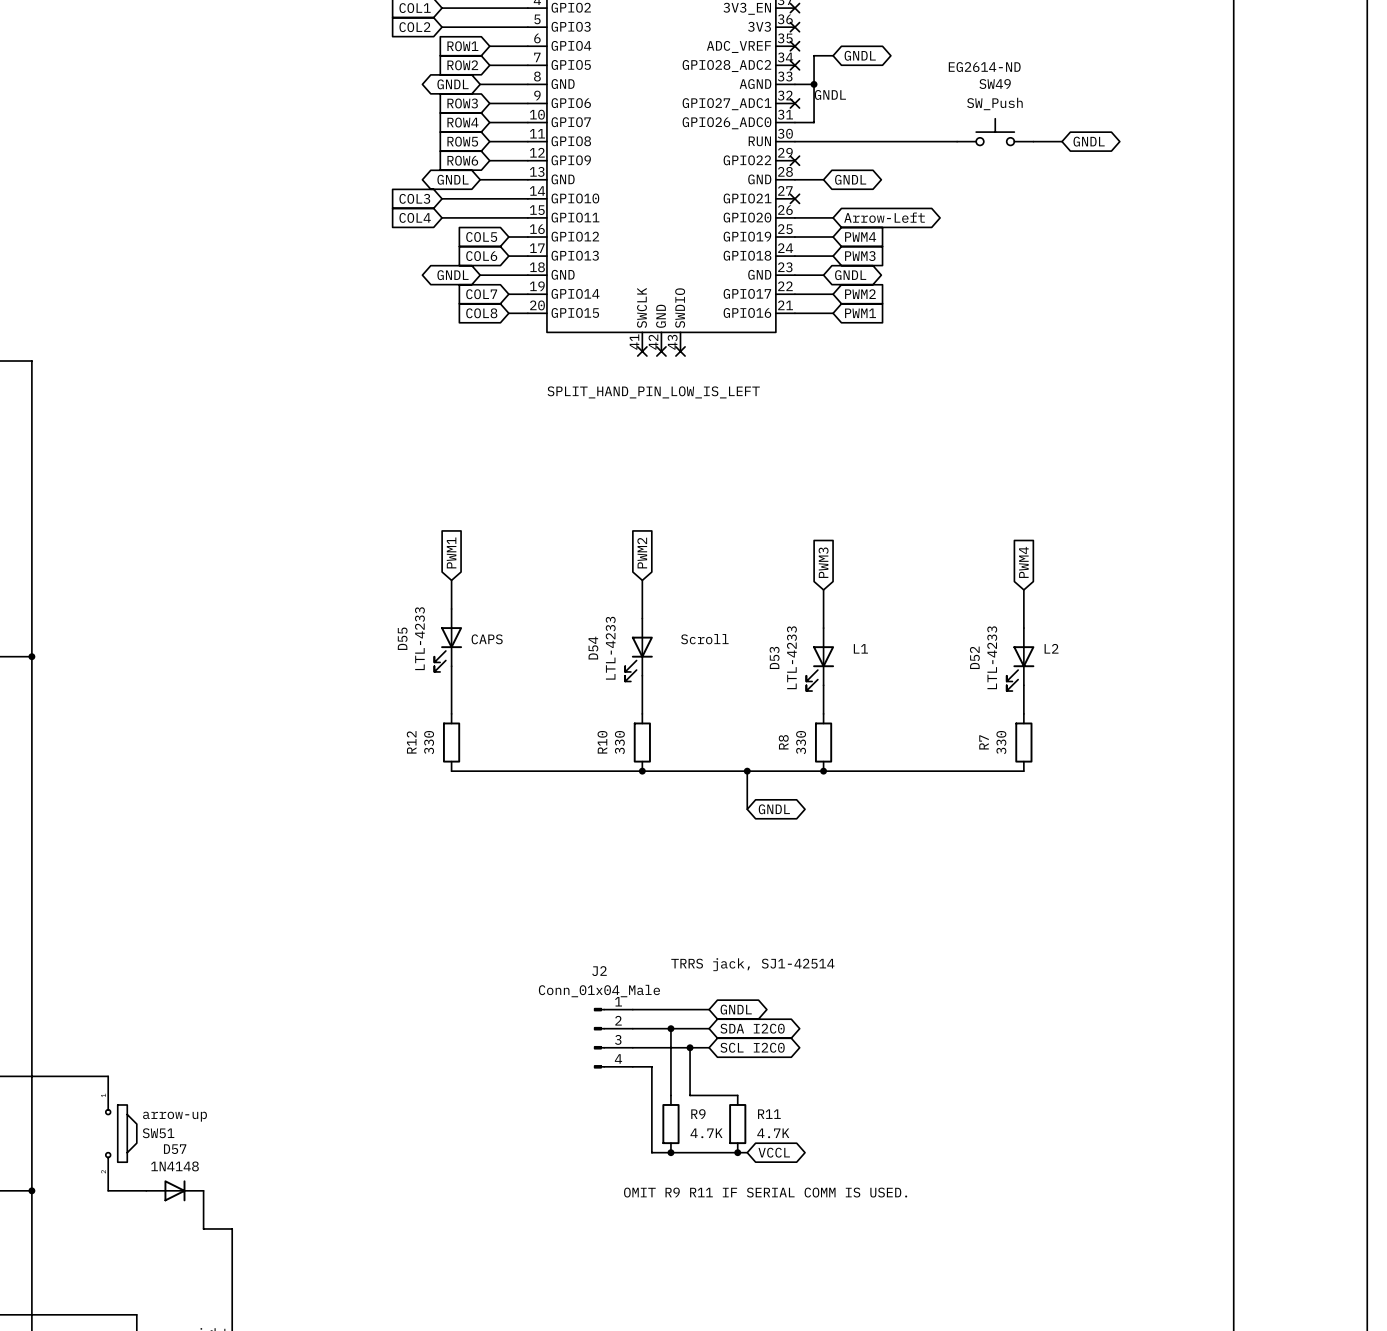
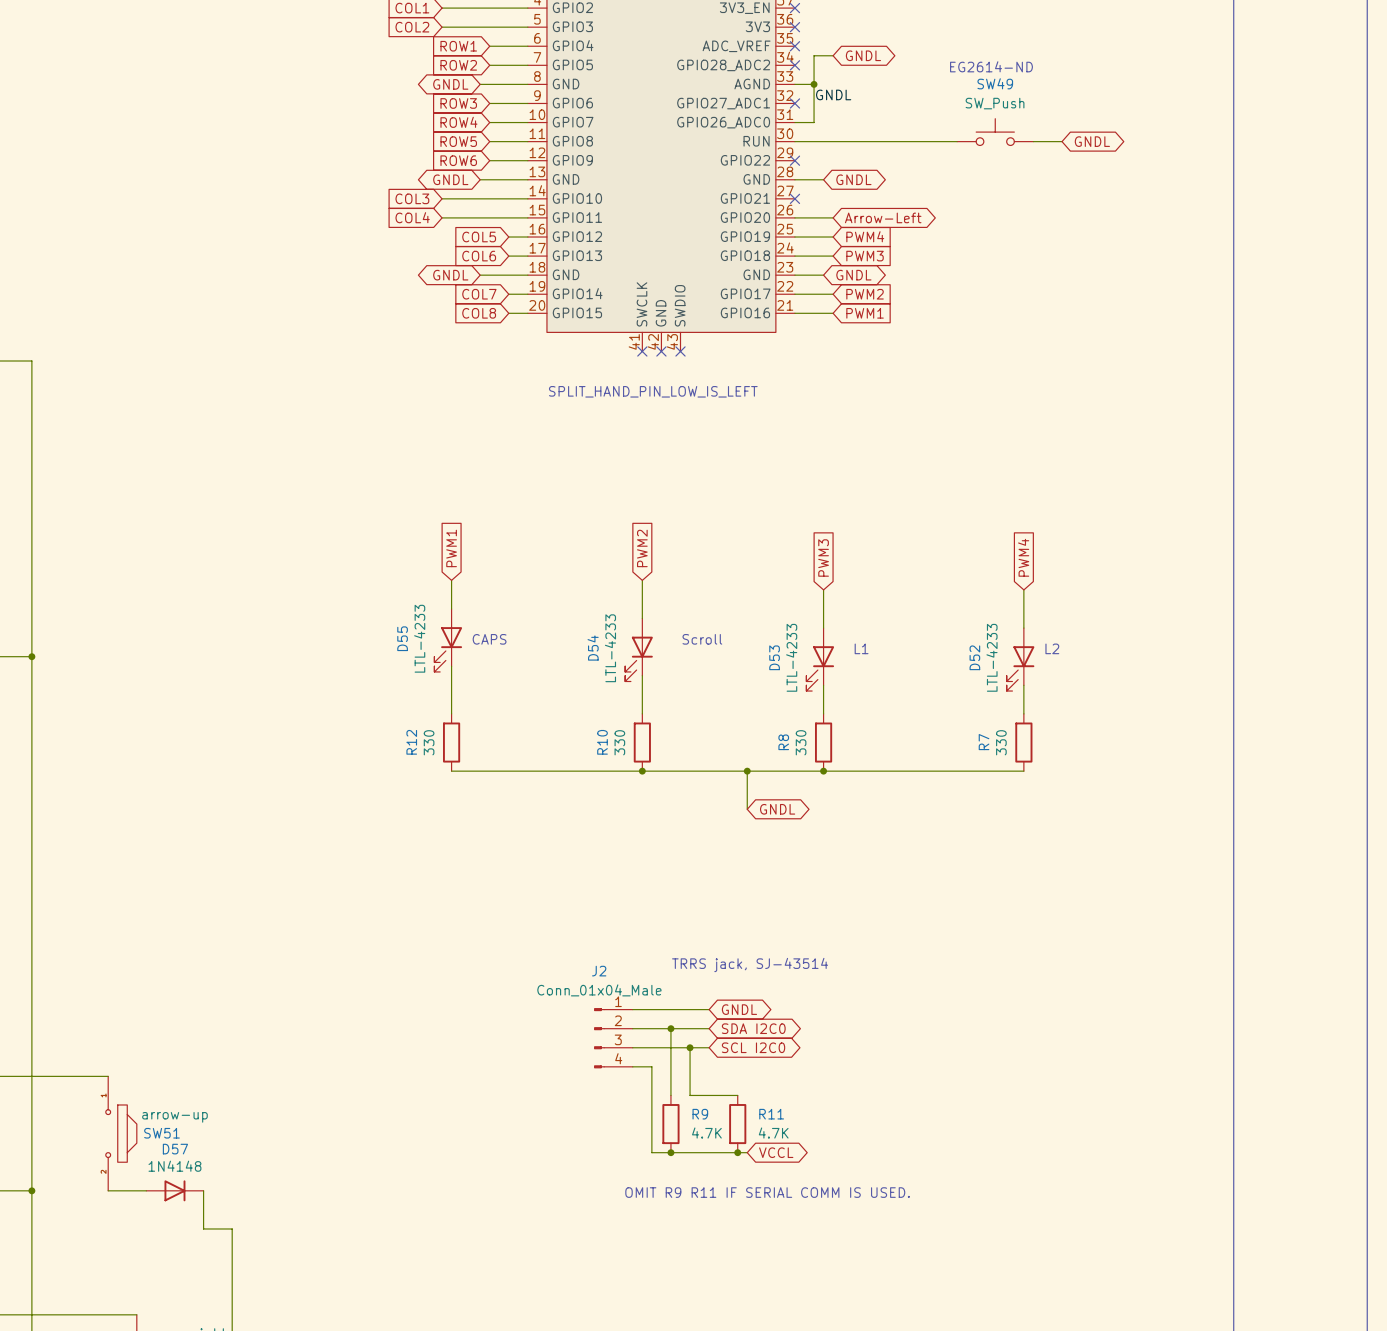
text: TRRS jack, SJ1-42514 (752, 964) -> TRRS jack, SJ-43514 (750, 965)

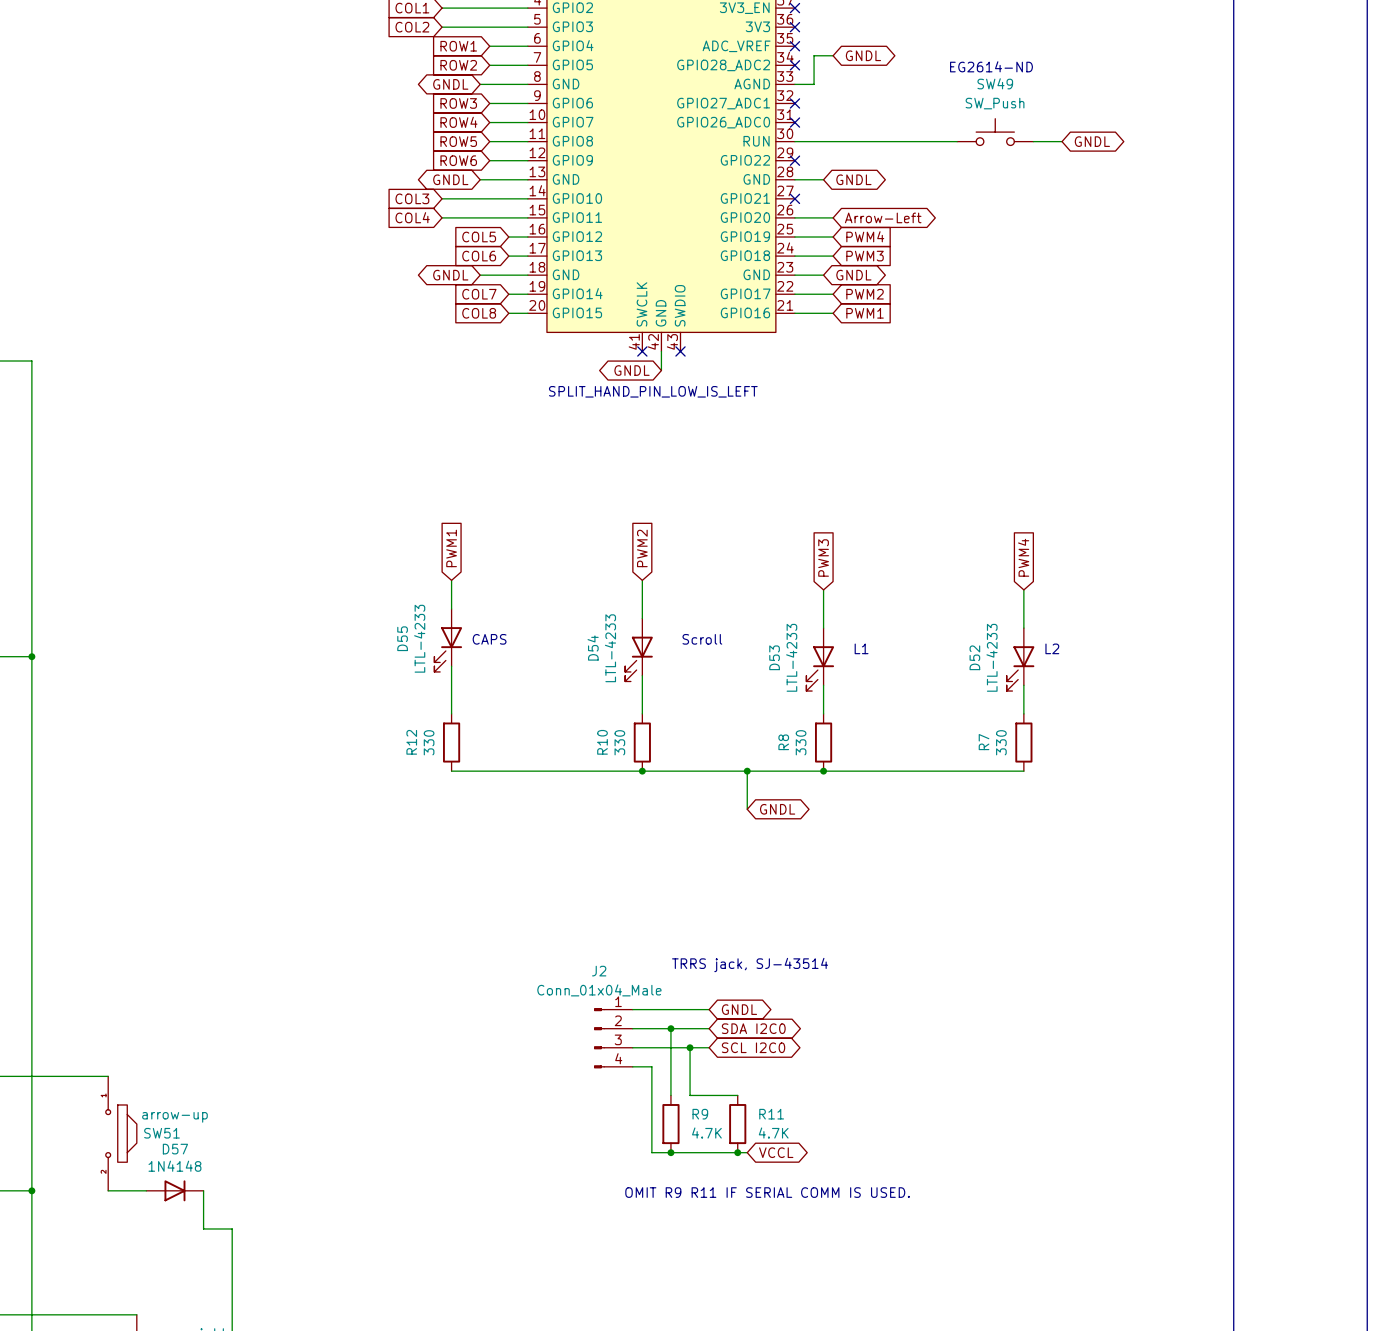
wire: (814, 84) (814, 122) (794, 122) -> none
junction: (814, 84) -> none
label: GNDL (833, 94) -> none
no-connect mark: none -> (794, 122)
wire: none -> (661, 351) (661, 370)
no-connect mark: (661, 351) -> none
global label: none -> GNDL (631, 370)

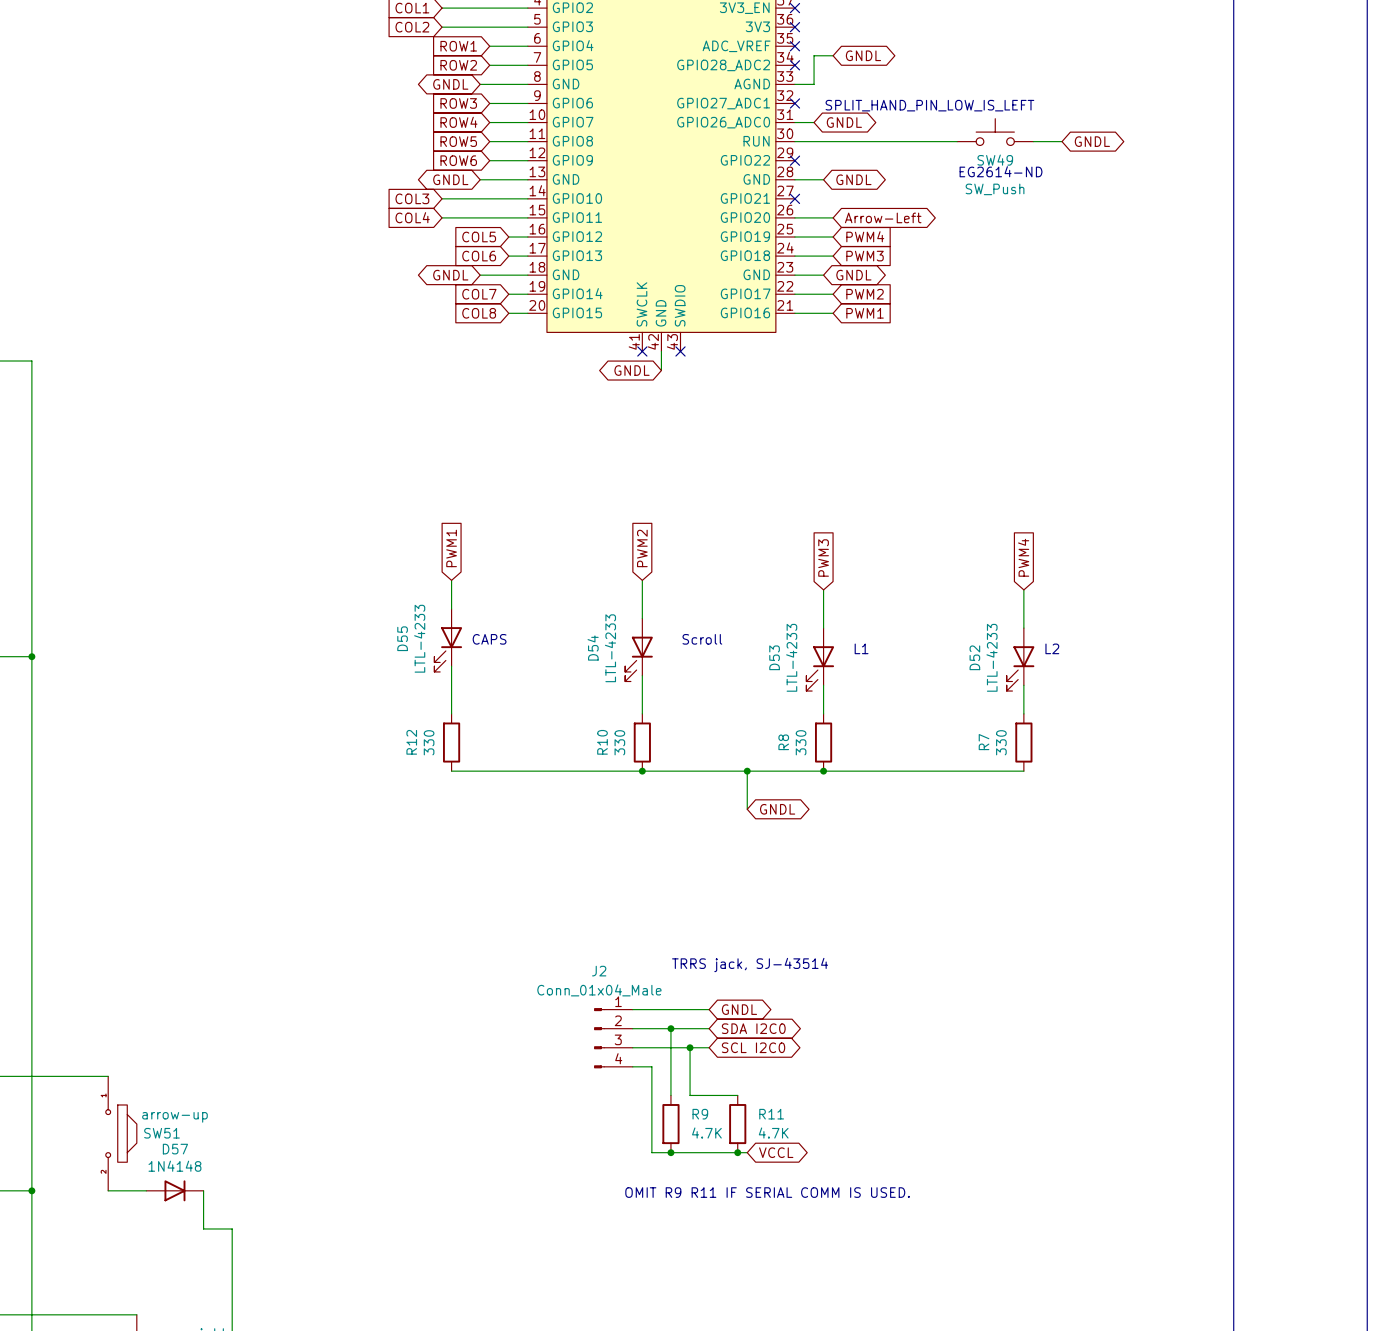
text position: EG2614-ND (991, 66) -> EG2614-ND (1001, 171)
SW49 name position: SW49 (995, 83) -> SW49 (995, 160)
SW49 value position: SW_Push (995, 103) -> SW_Push (995, 189)
text: none -> SPLIT_HAND_PIN_LOW_IS_LEFT (929, 105)
wire: none -> (794, 122) (814, 122)
no-connect mark: (794, 122) -> none
global label: none -> GNDL (844, 122)
text: SPLIT_HAND_PIN_LOW_IS_LEFT (653, 391) -> none

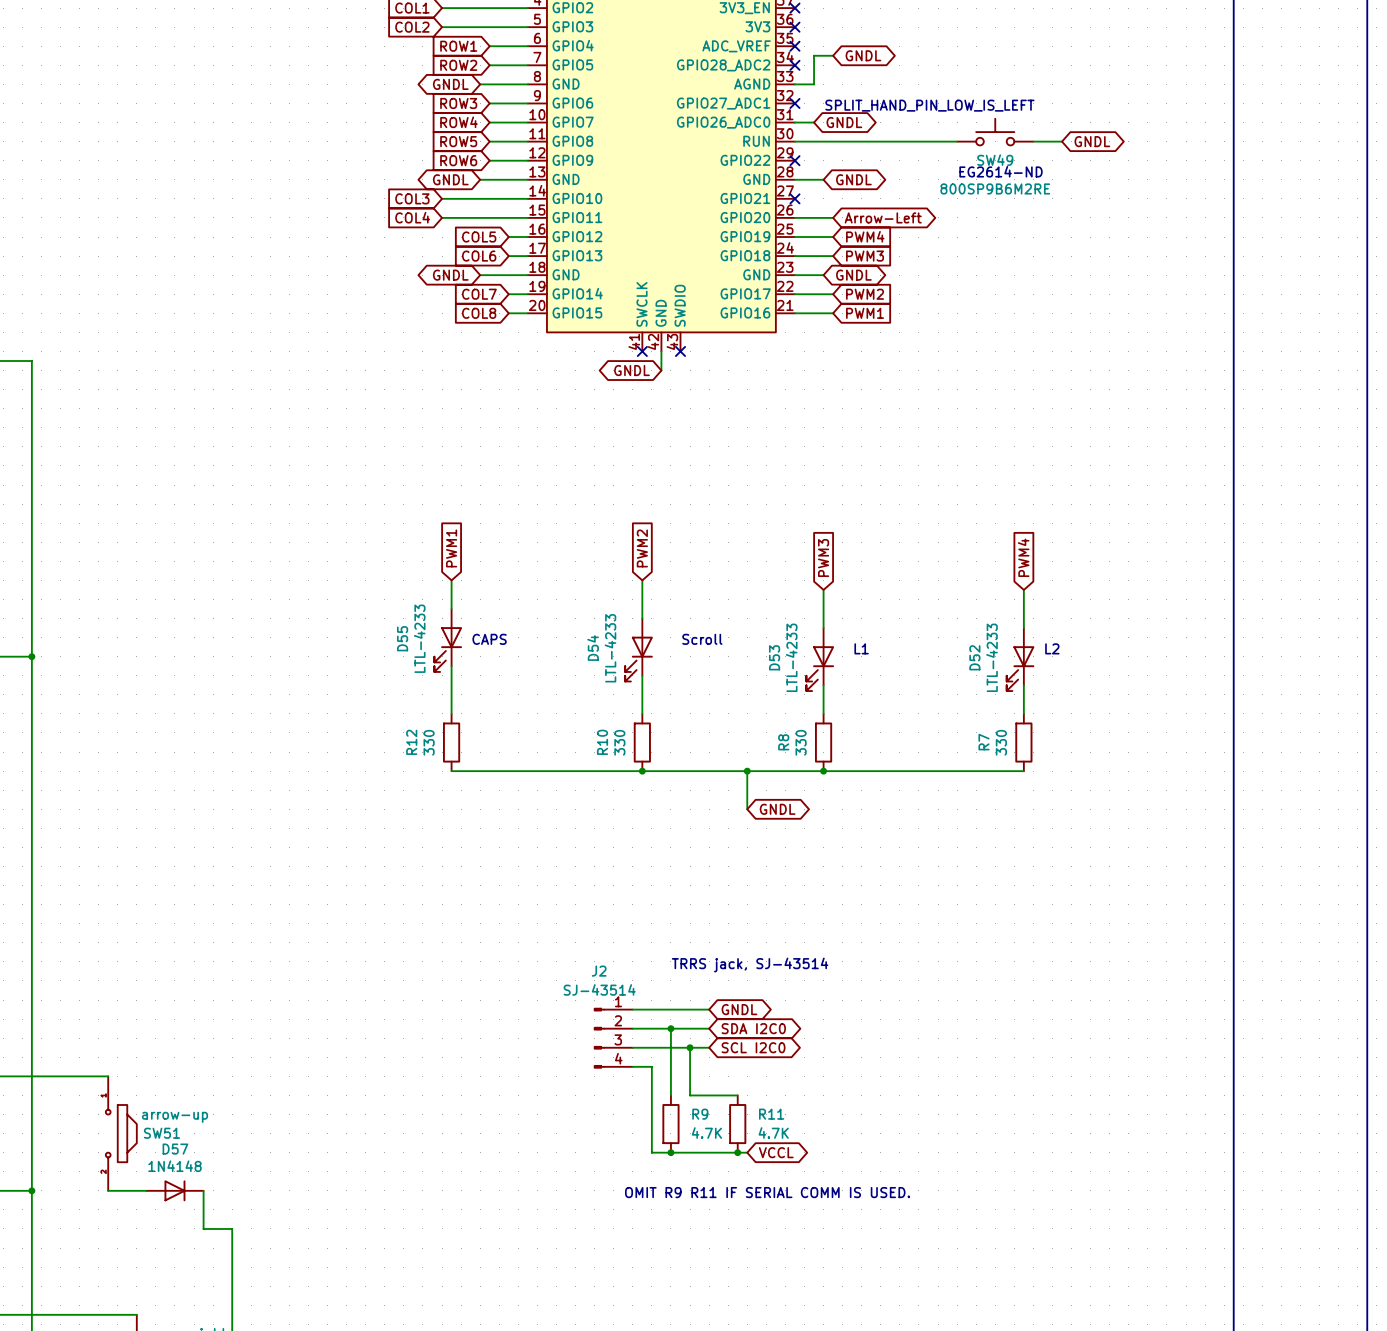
SW49 value: SW_Push (995, 189) -> 800SP9B6M2RE (995, 188)
J2 value: Conn_01x04_Male (599, 990) -> SJ-43514 (599, 989)

